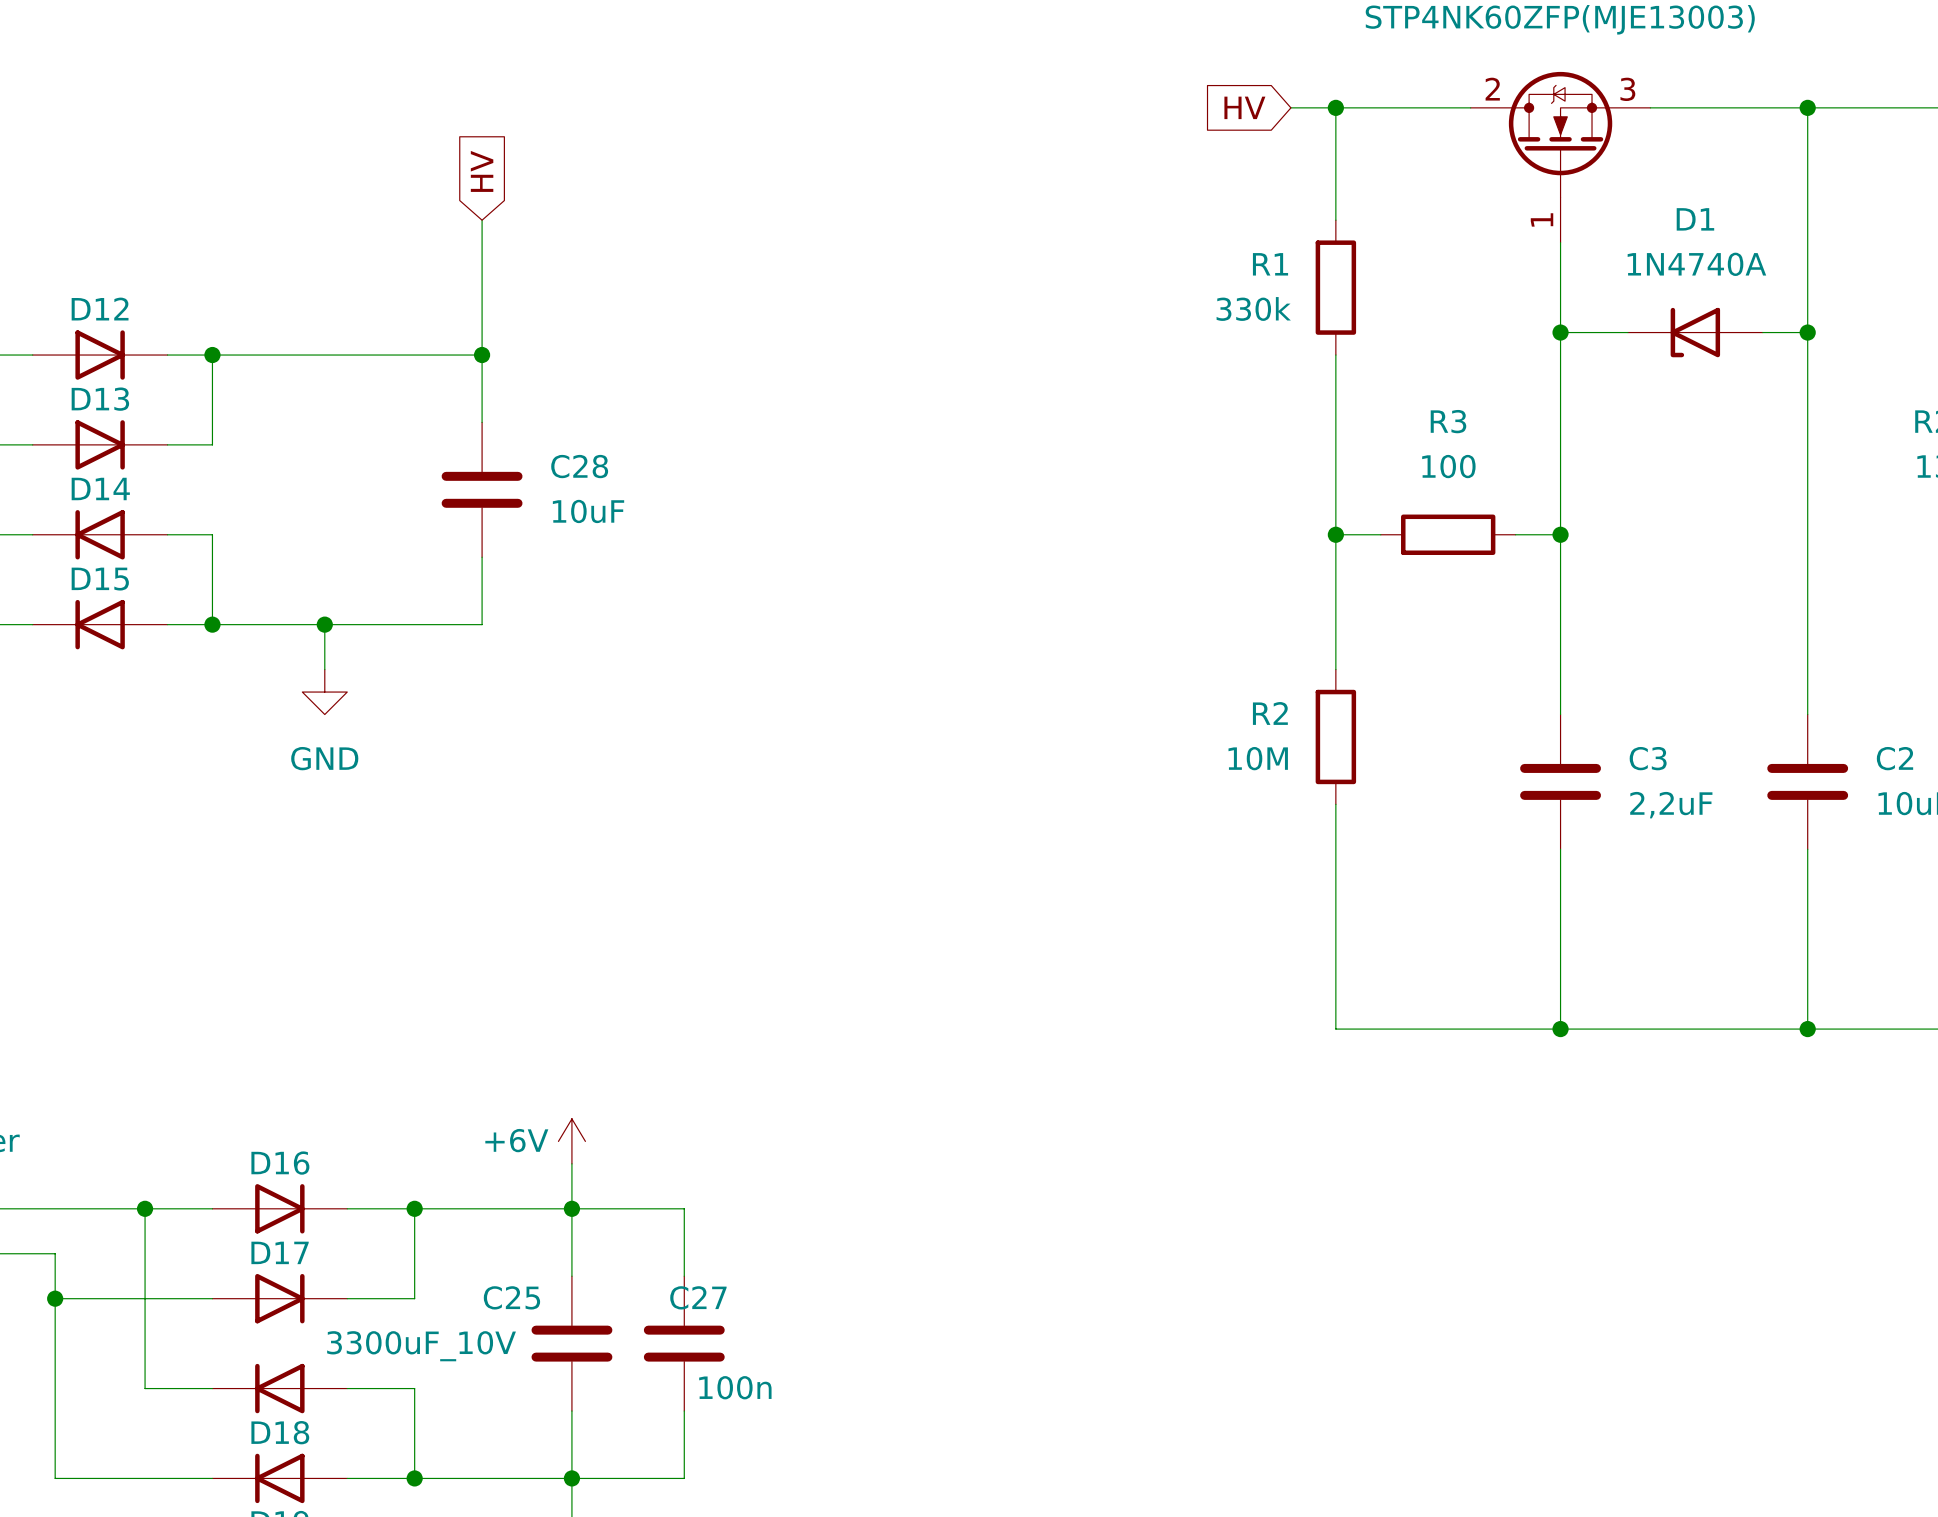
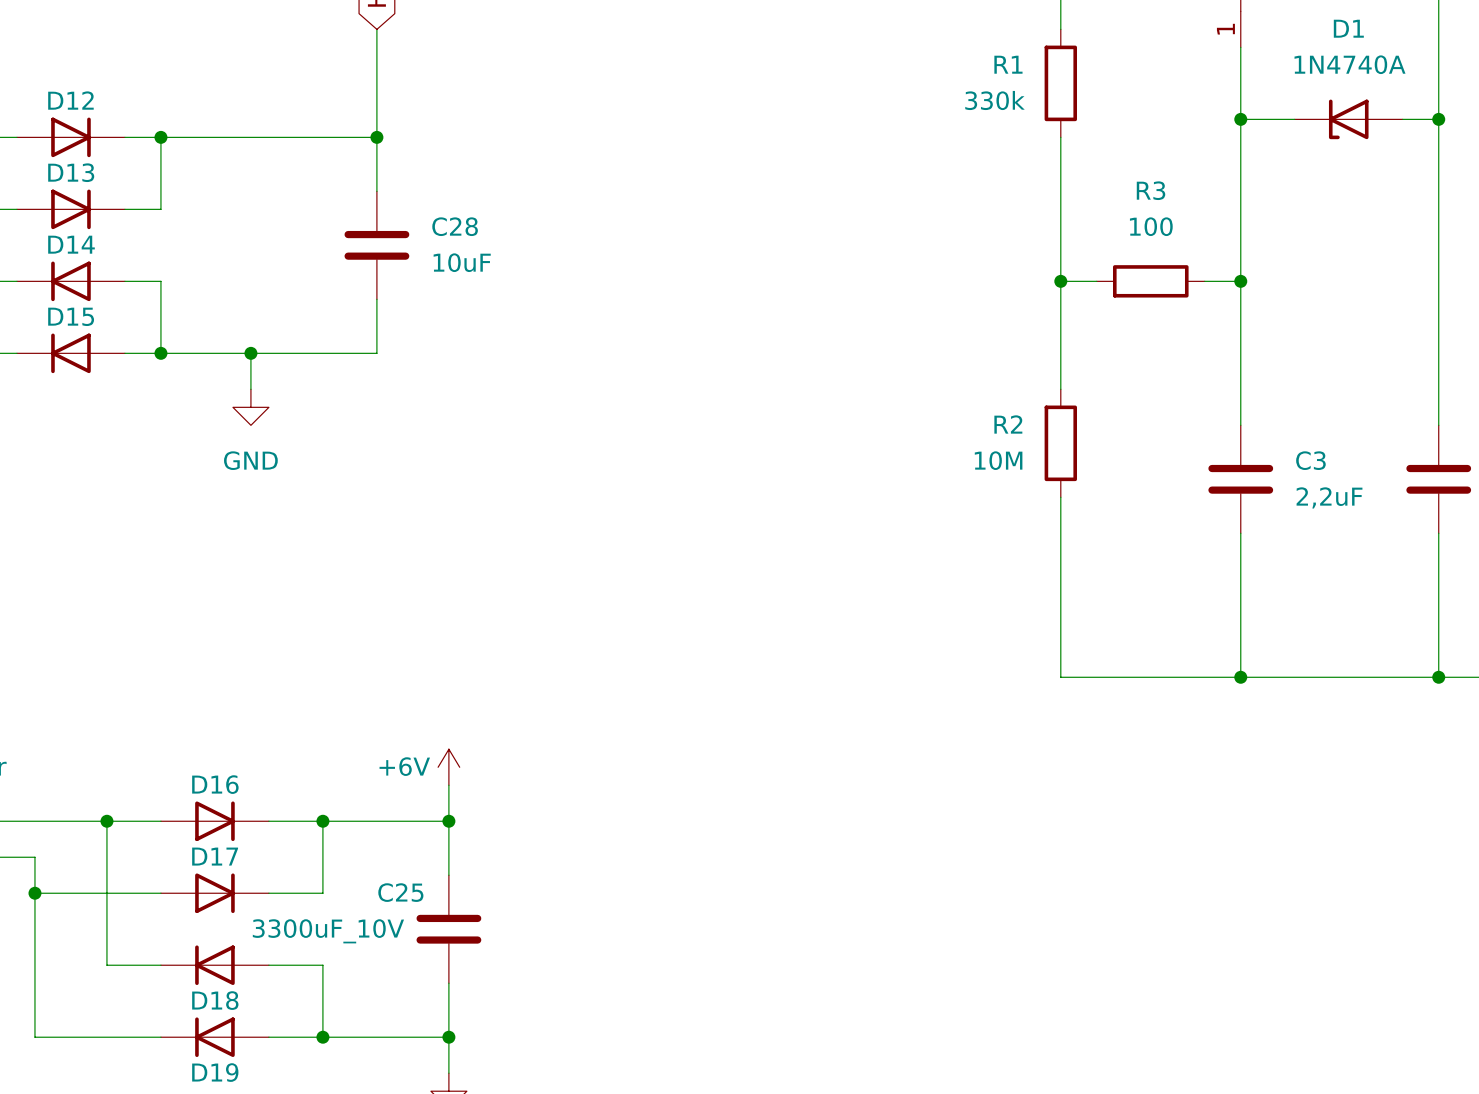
wire: (571, 1208) (684, 1208) (684, 1276) -> none
C27: 100n (684, 1343) -> none
wire: (684, 1411) (684, 1478) (571, 1478) -> none

